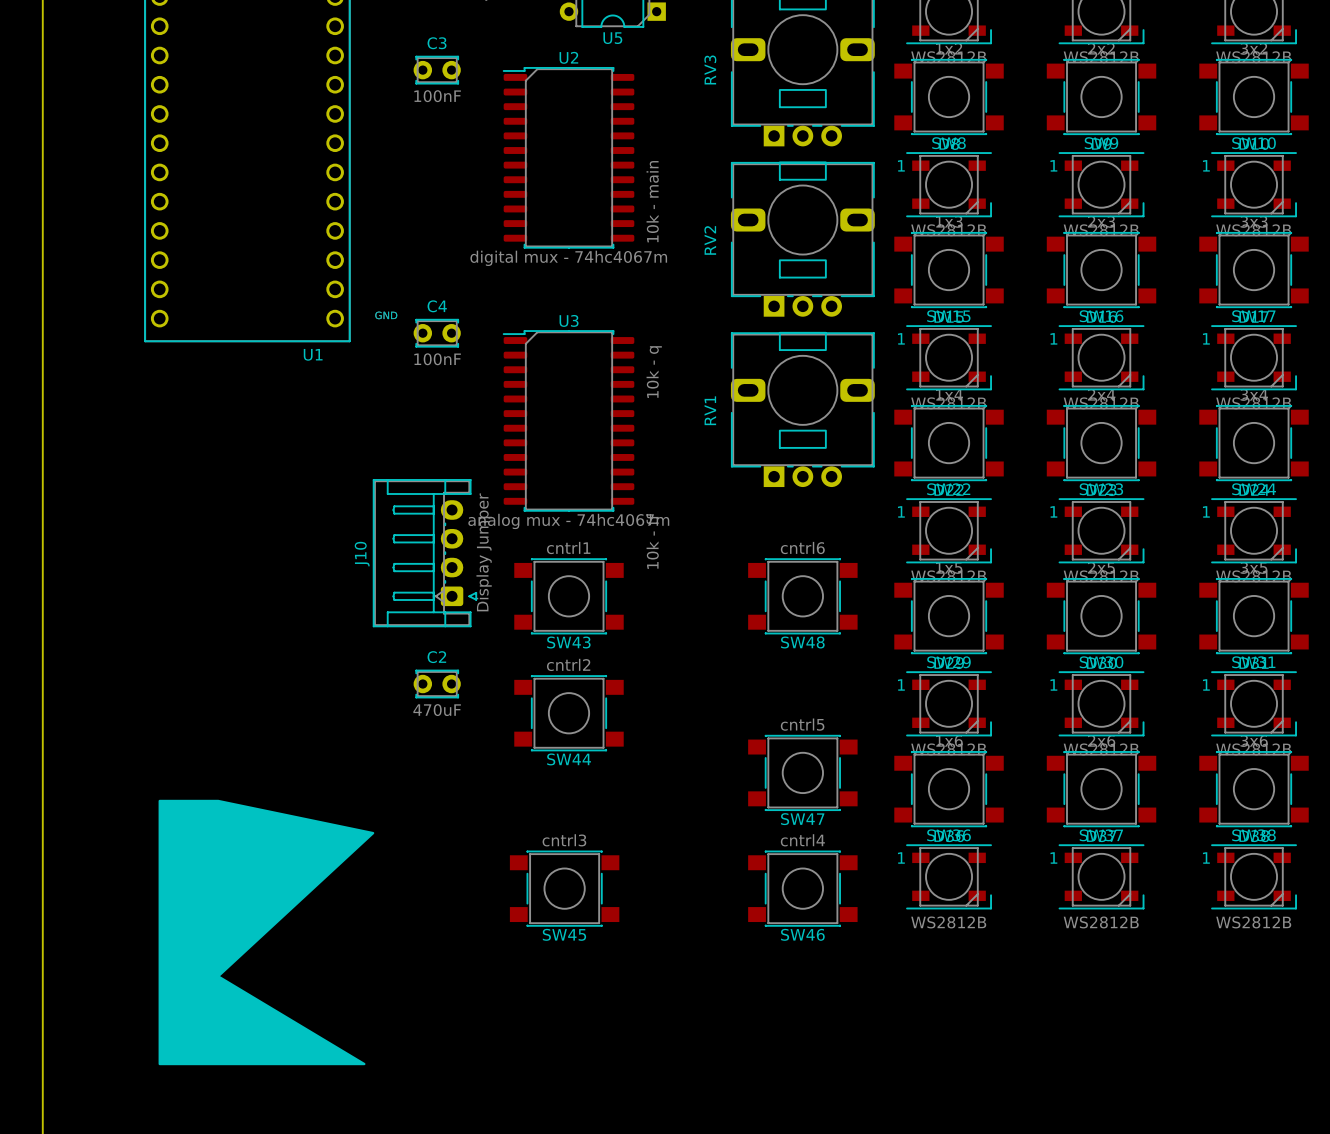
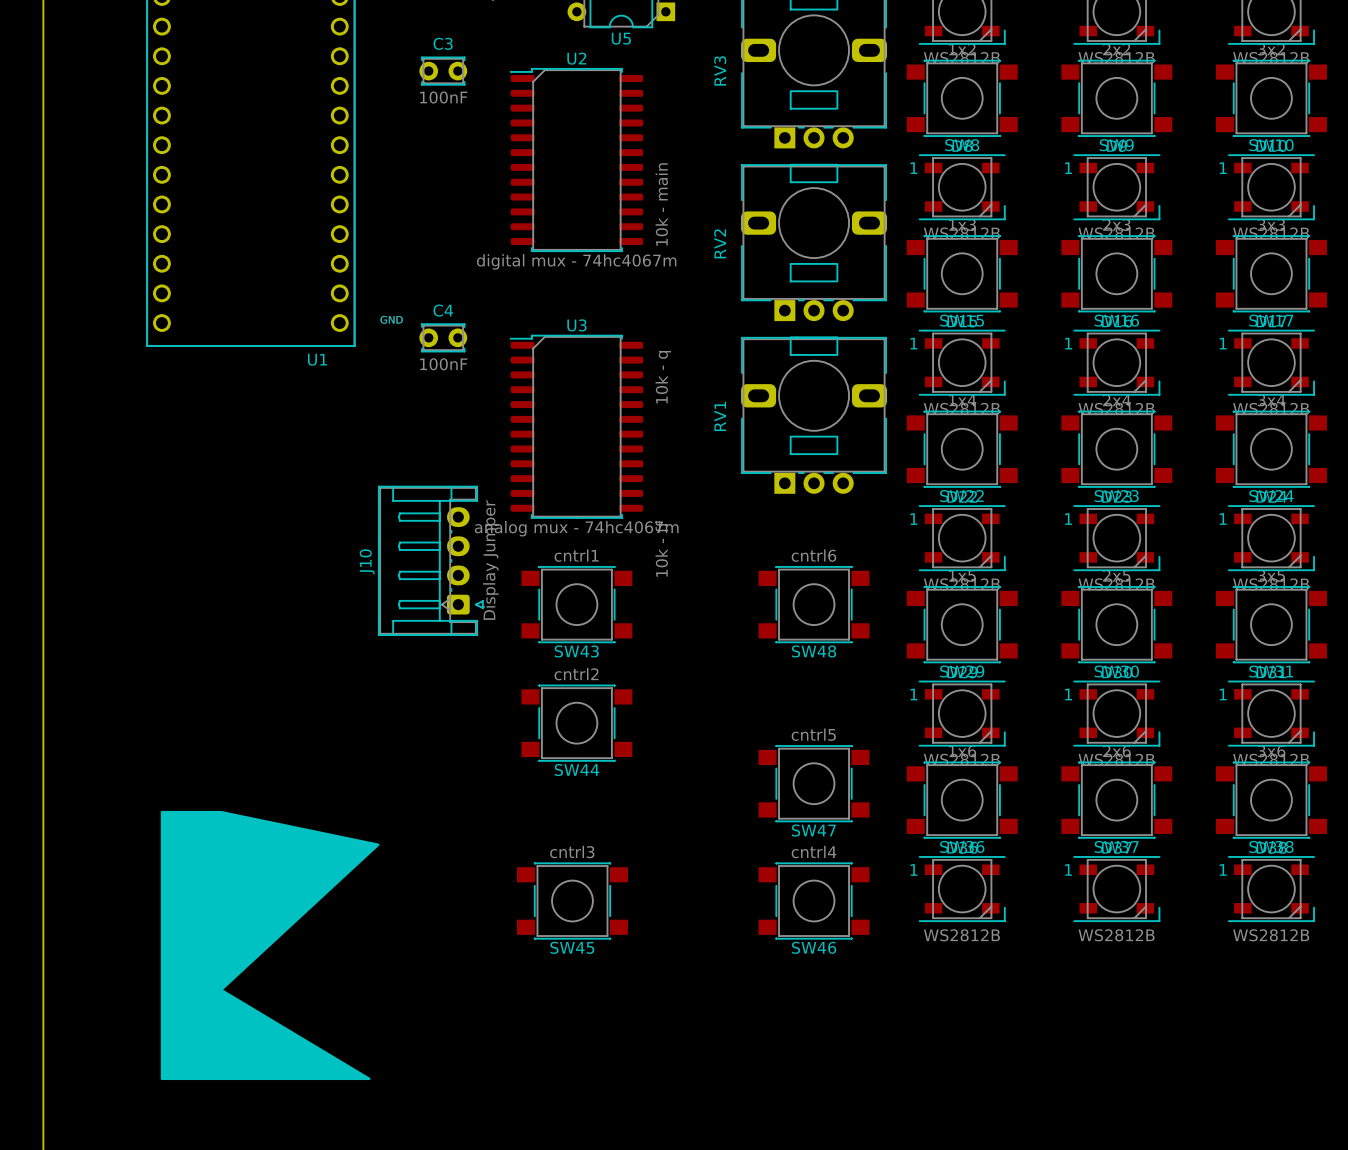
C2: 470uF (437, 684) -> none

